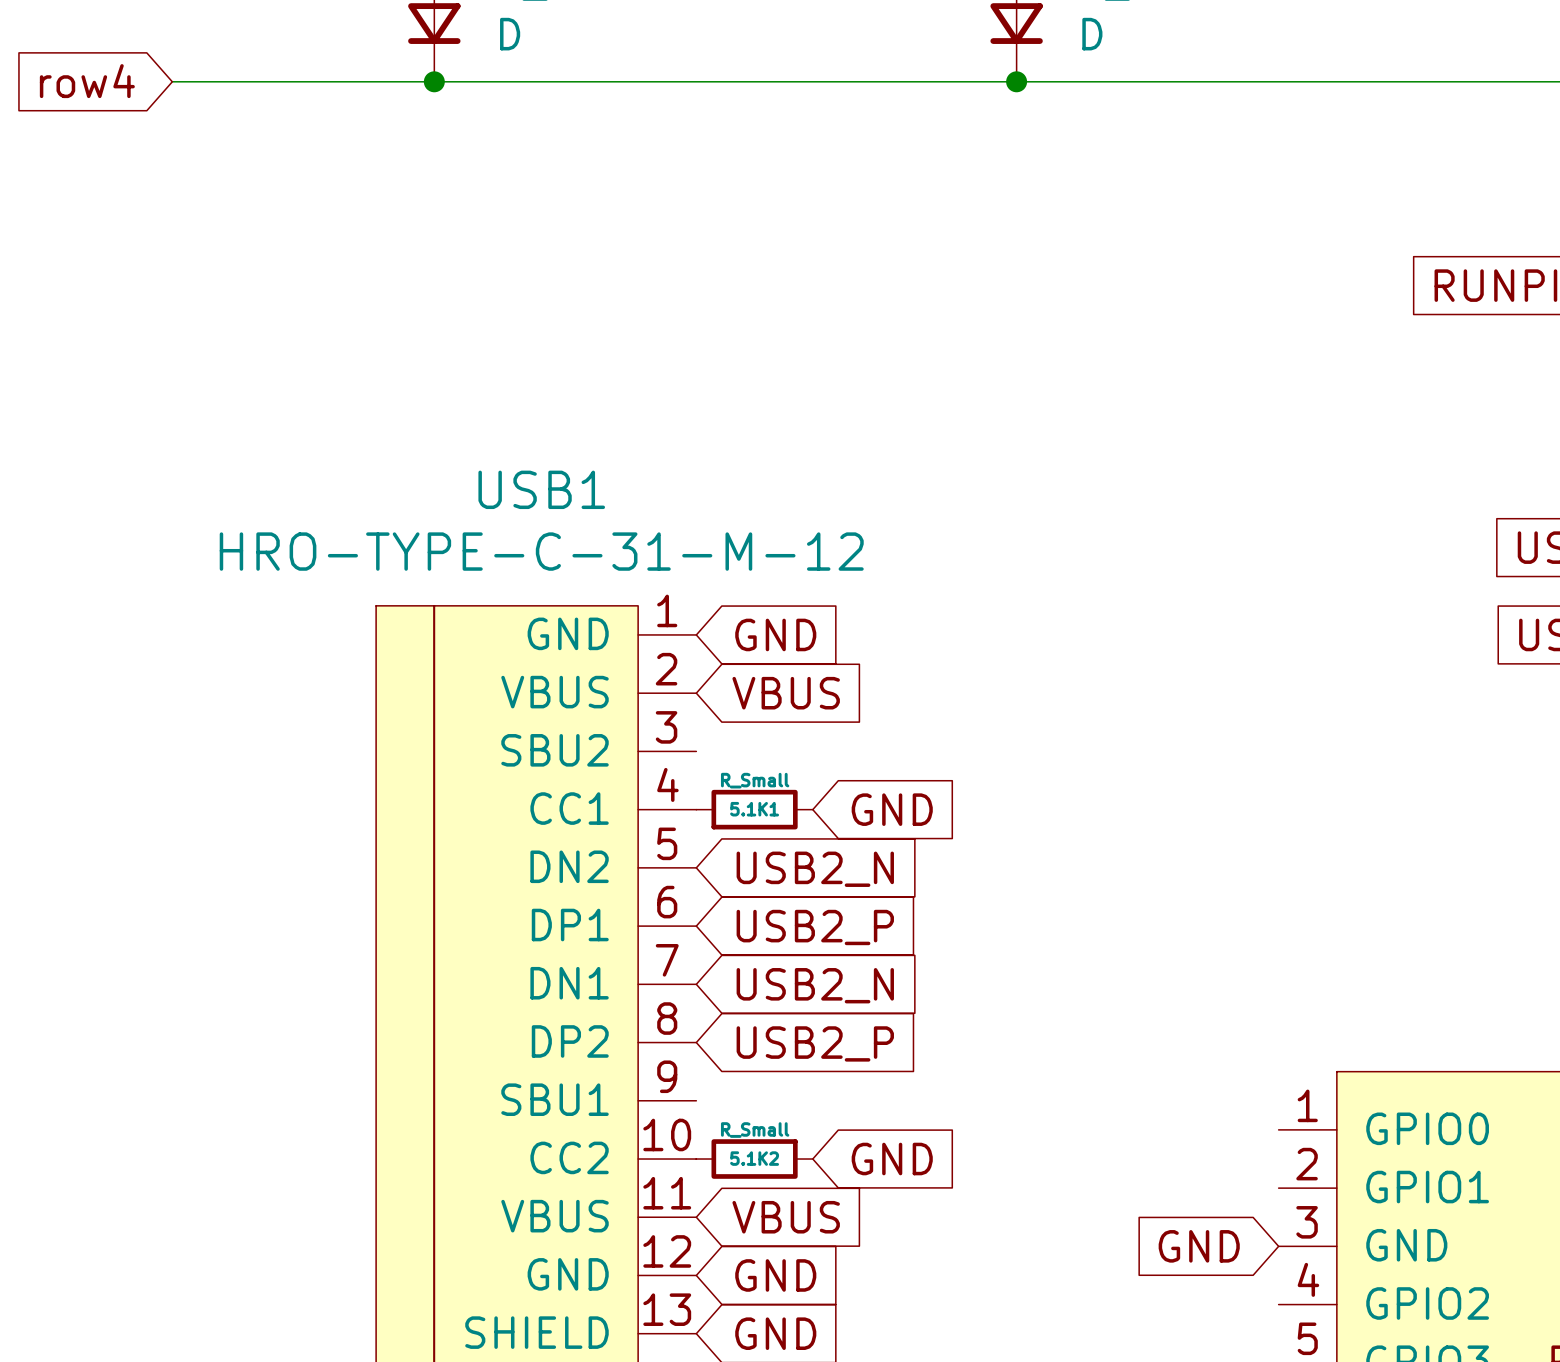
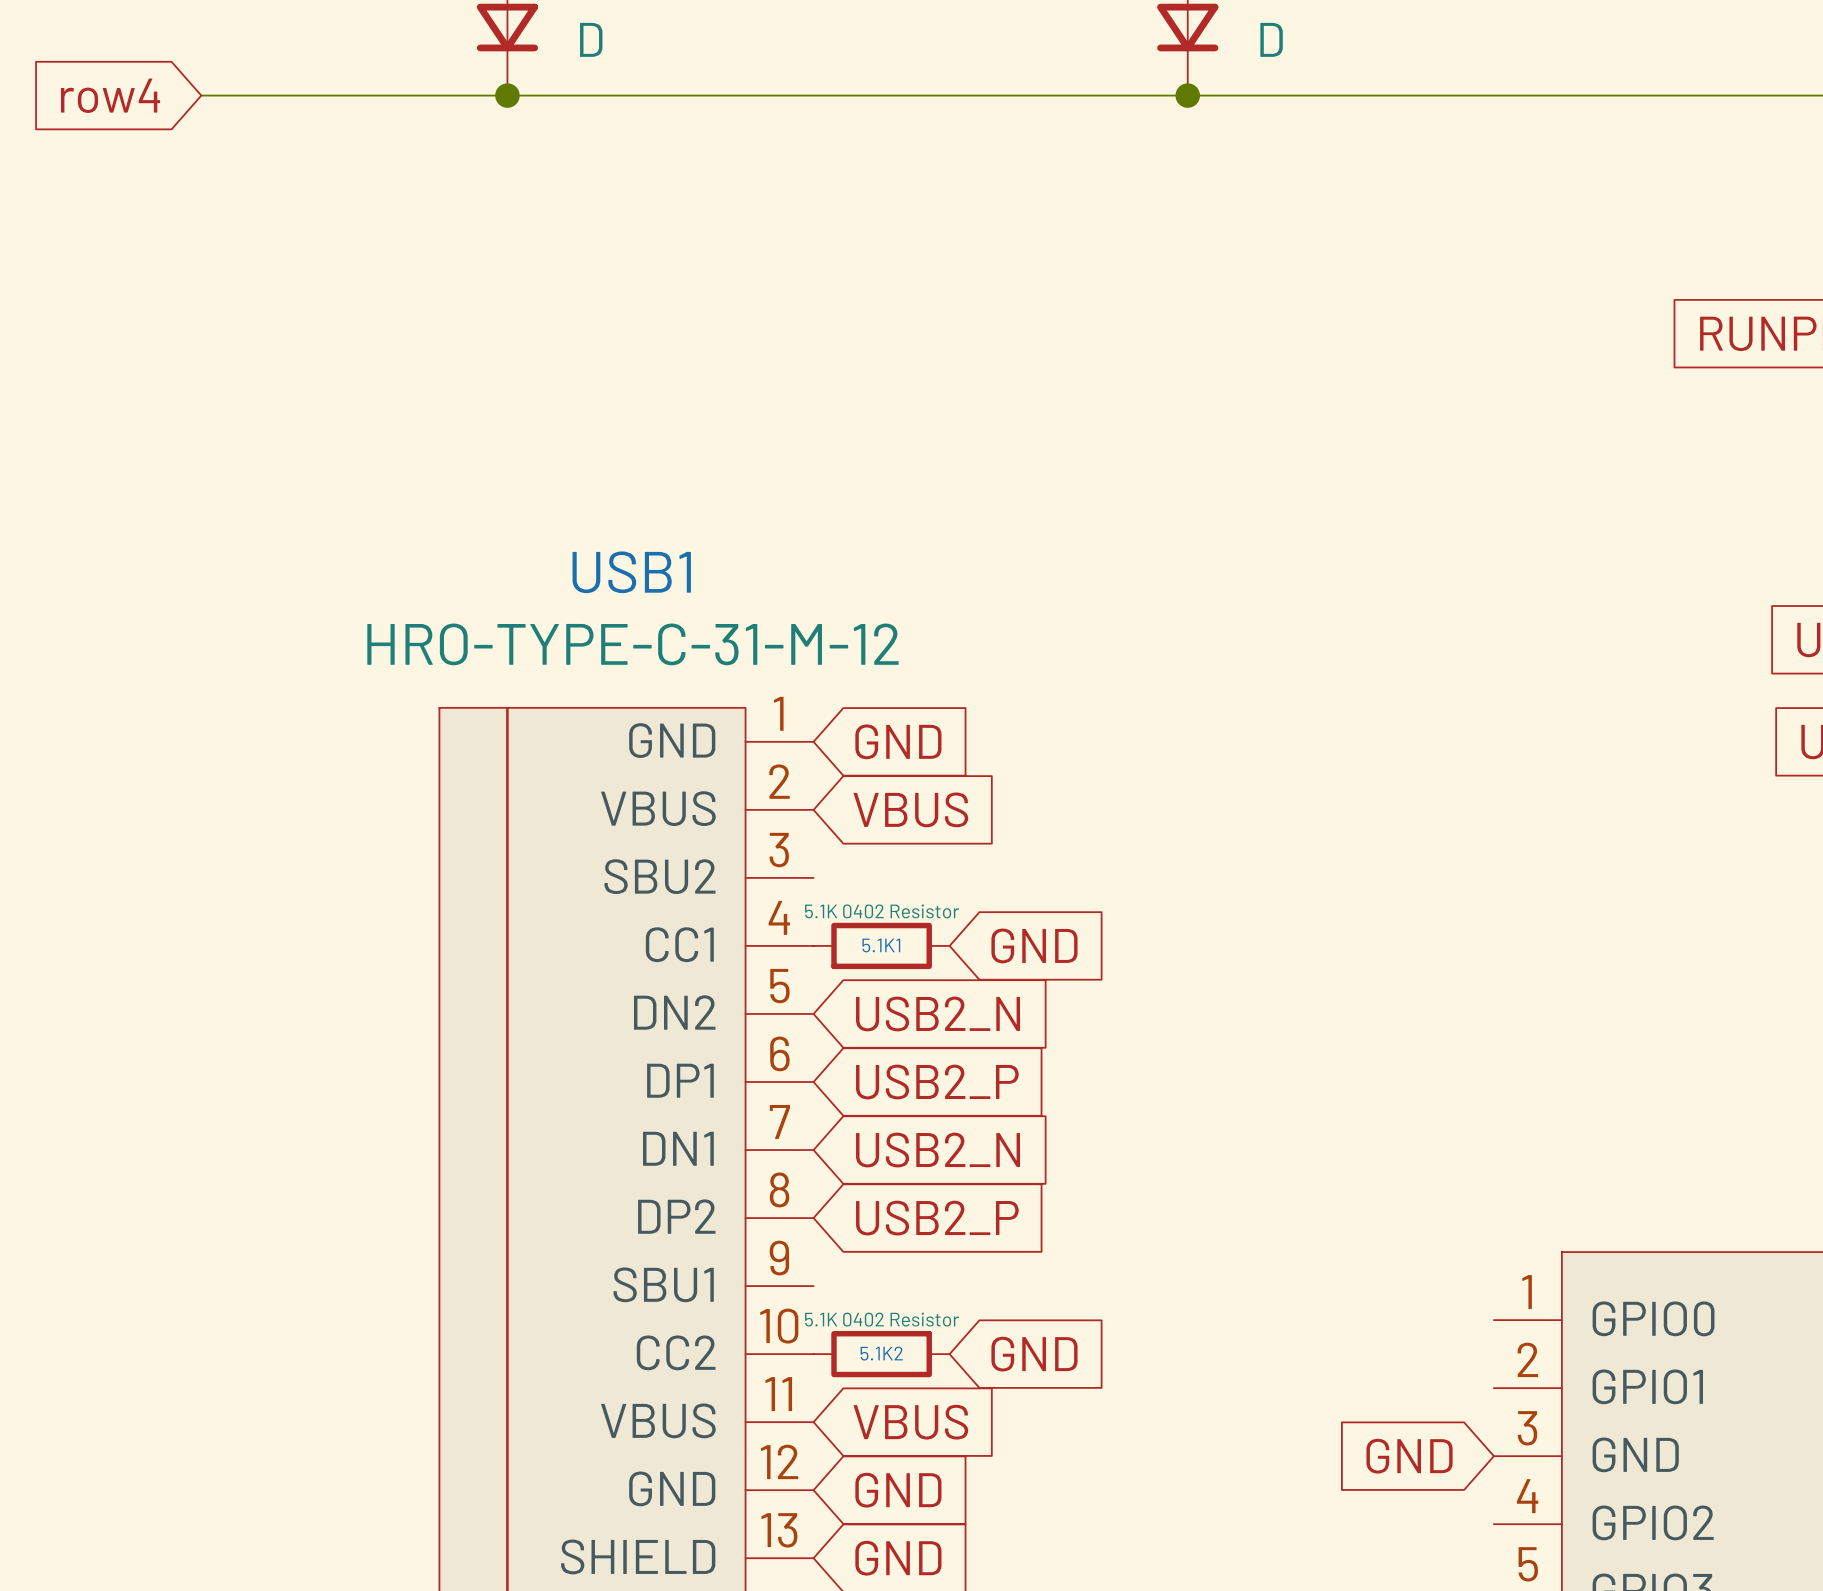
5.1K1 value: R_Small (755, 780) -> 5.1K 0402 Resistor (882, 911)
5.1K2 value: R_Small (755, 1130) -> 5.1K 0402 Resistor (882, 1319)

